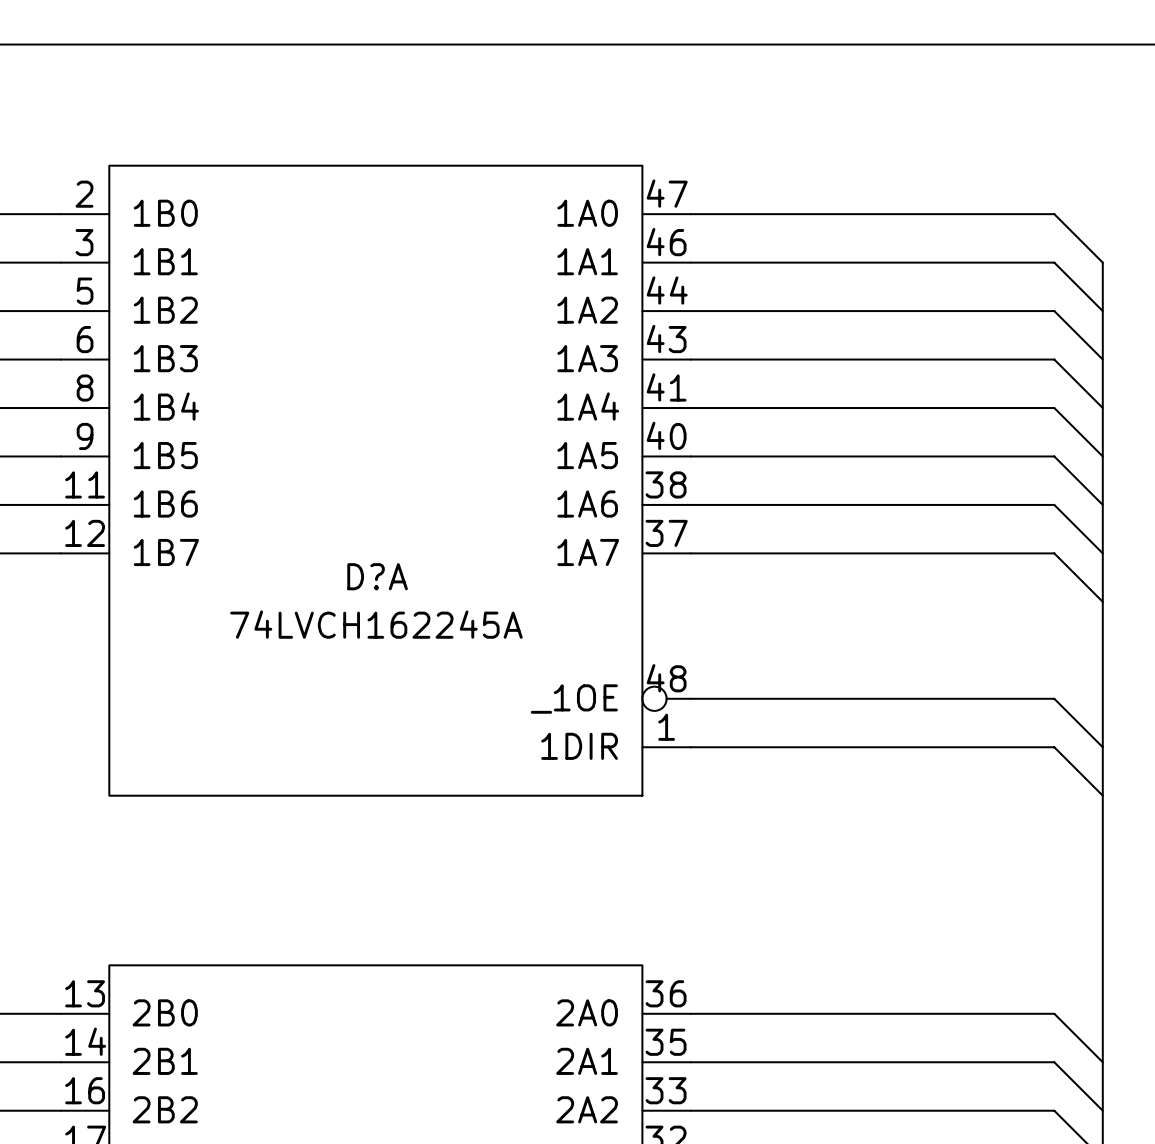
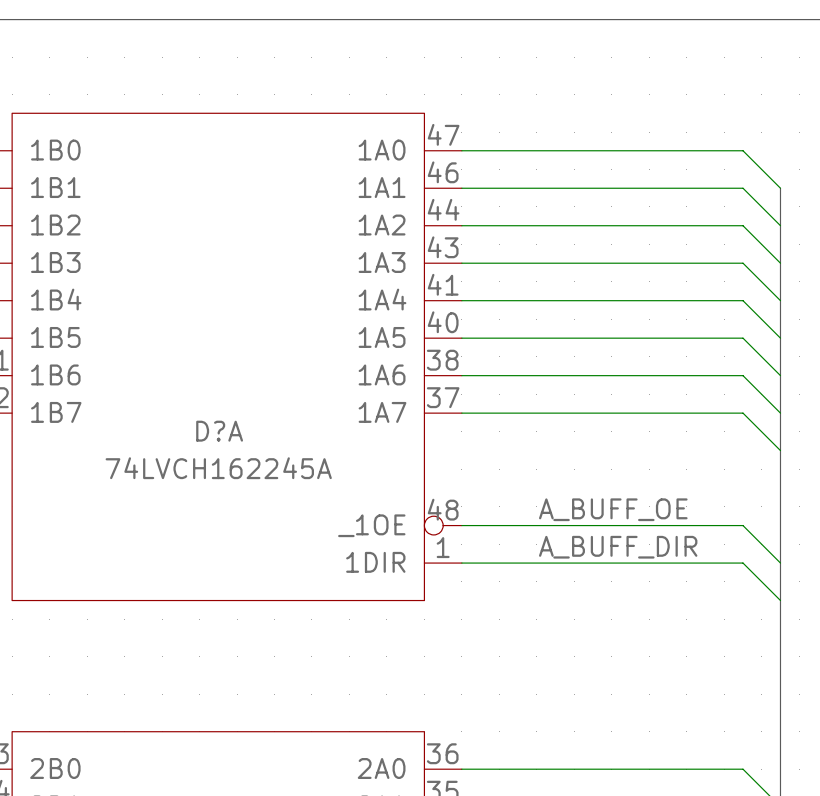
label: none -> A_BUFF_OE (613, 509)
label: none -> A_BUFF_DIR (618, 547)

